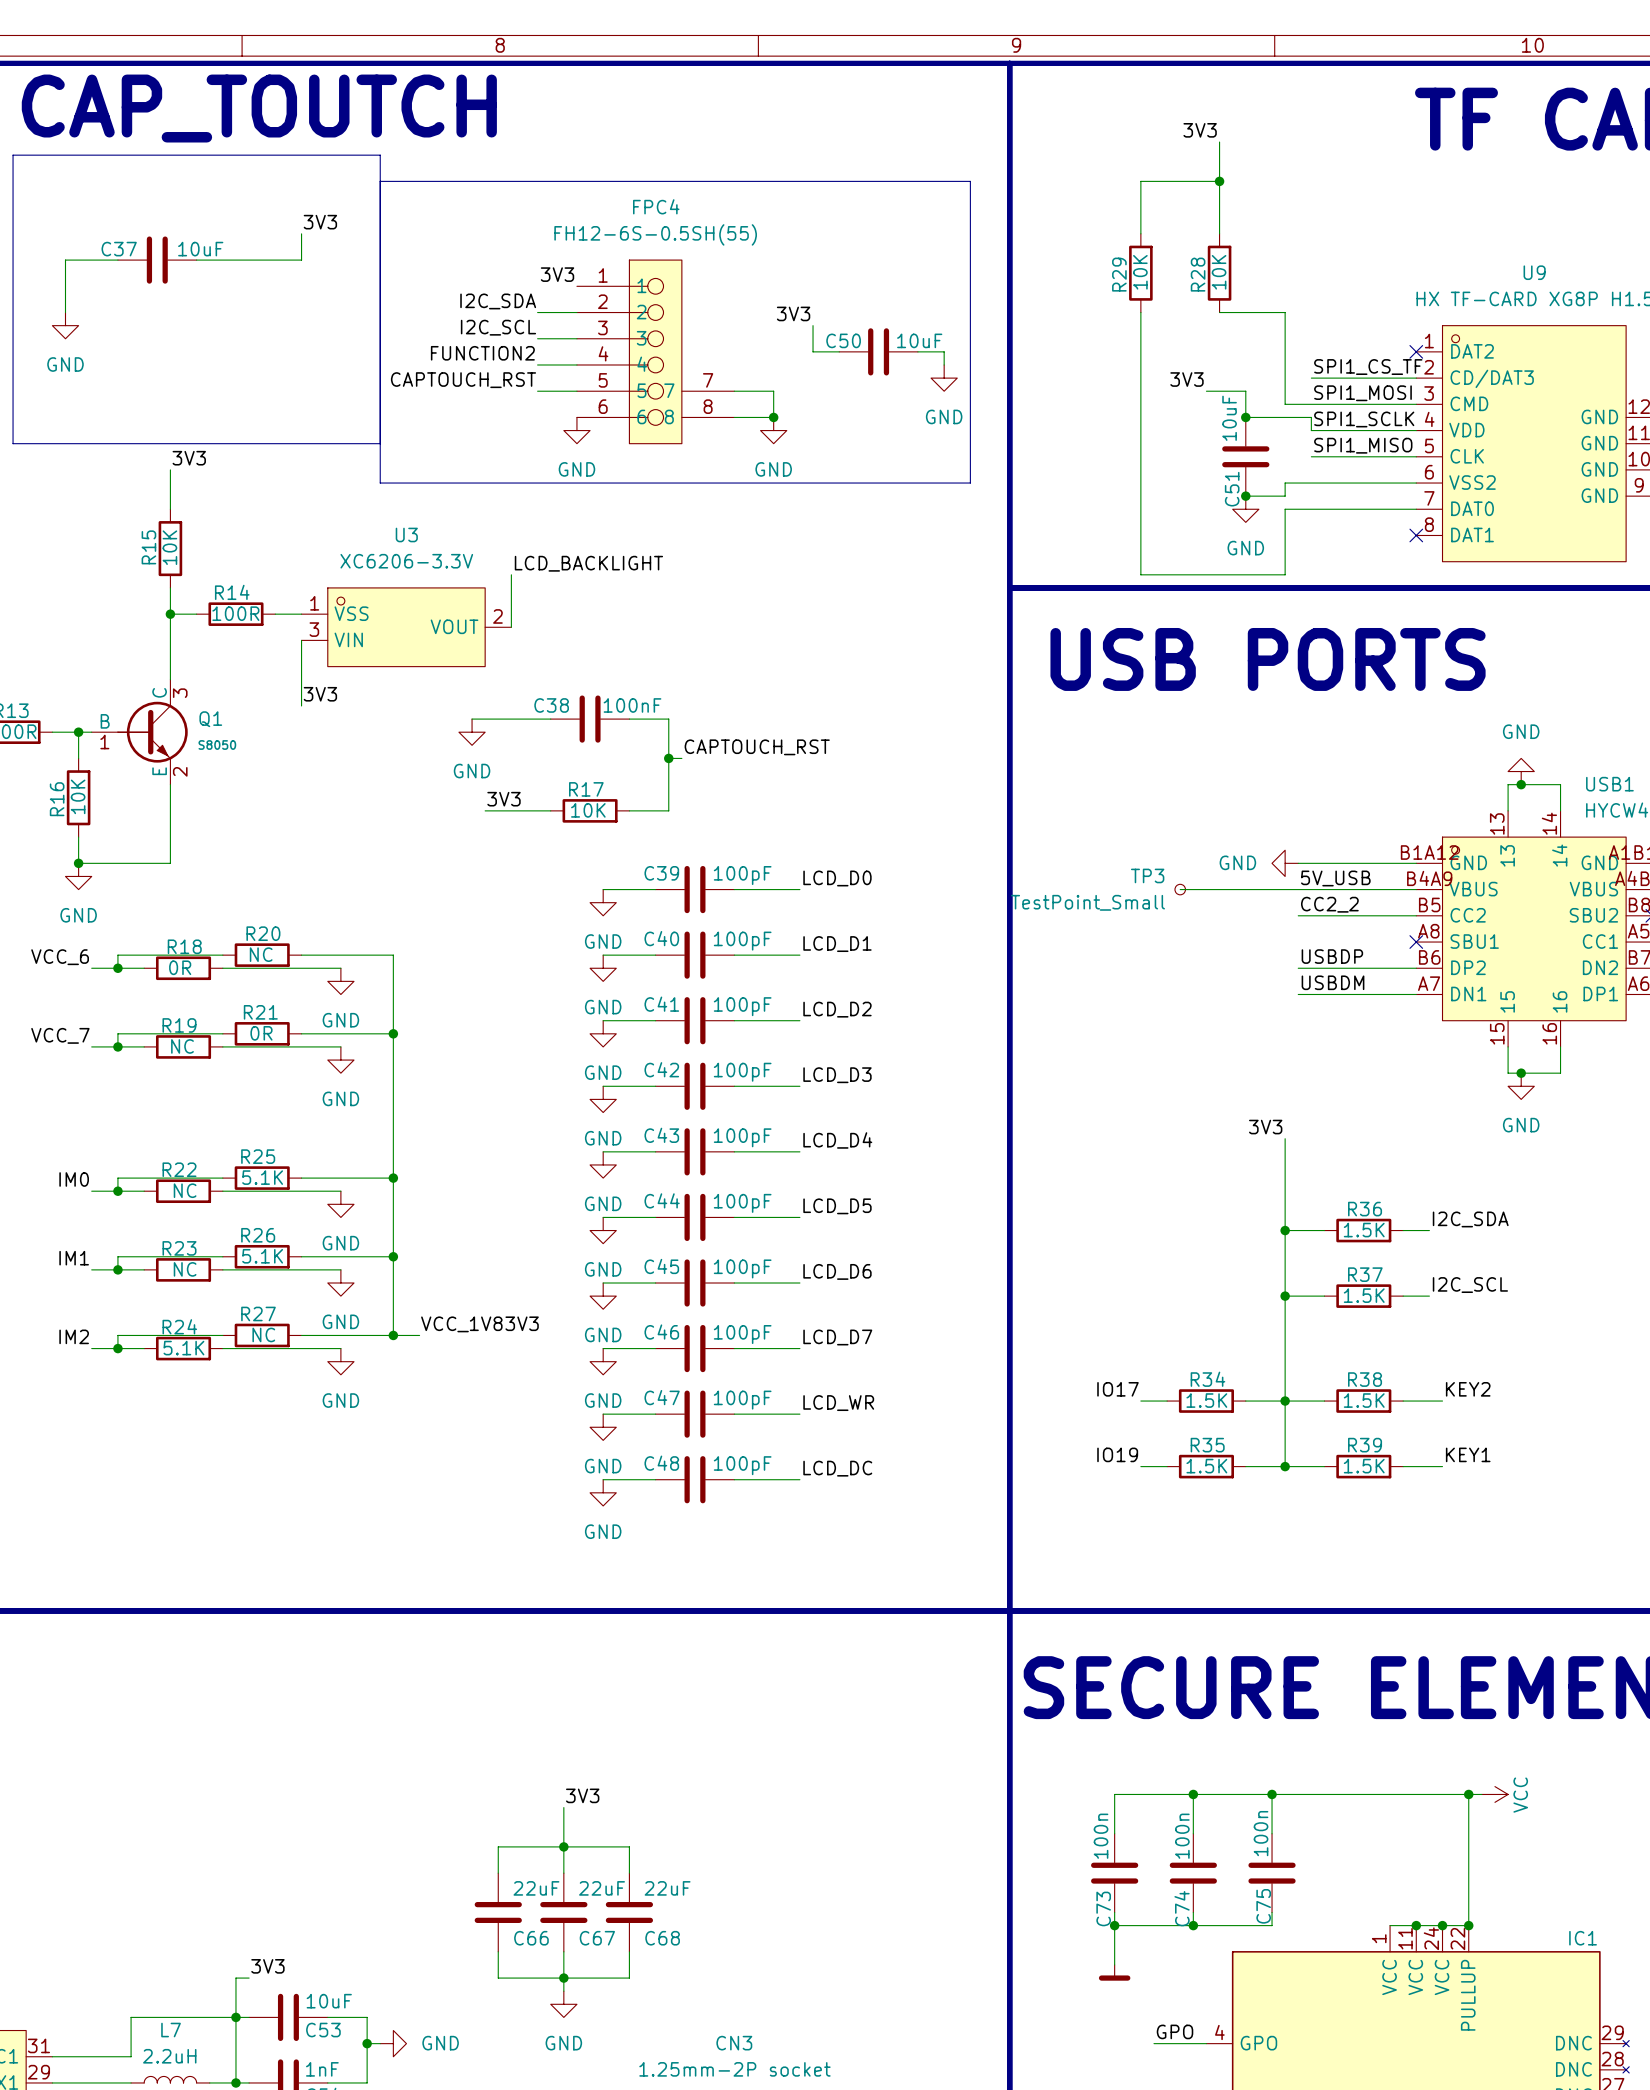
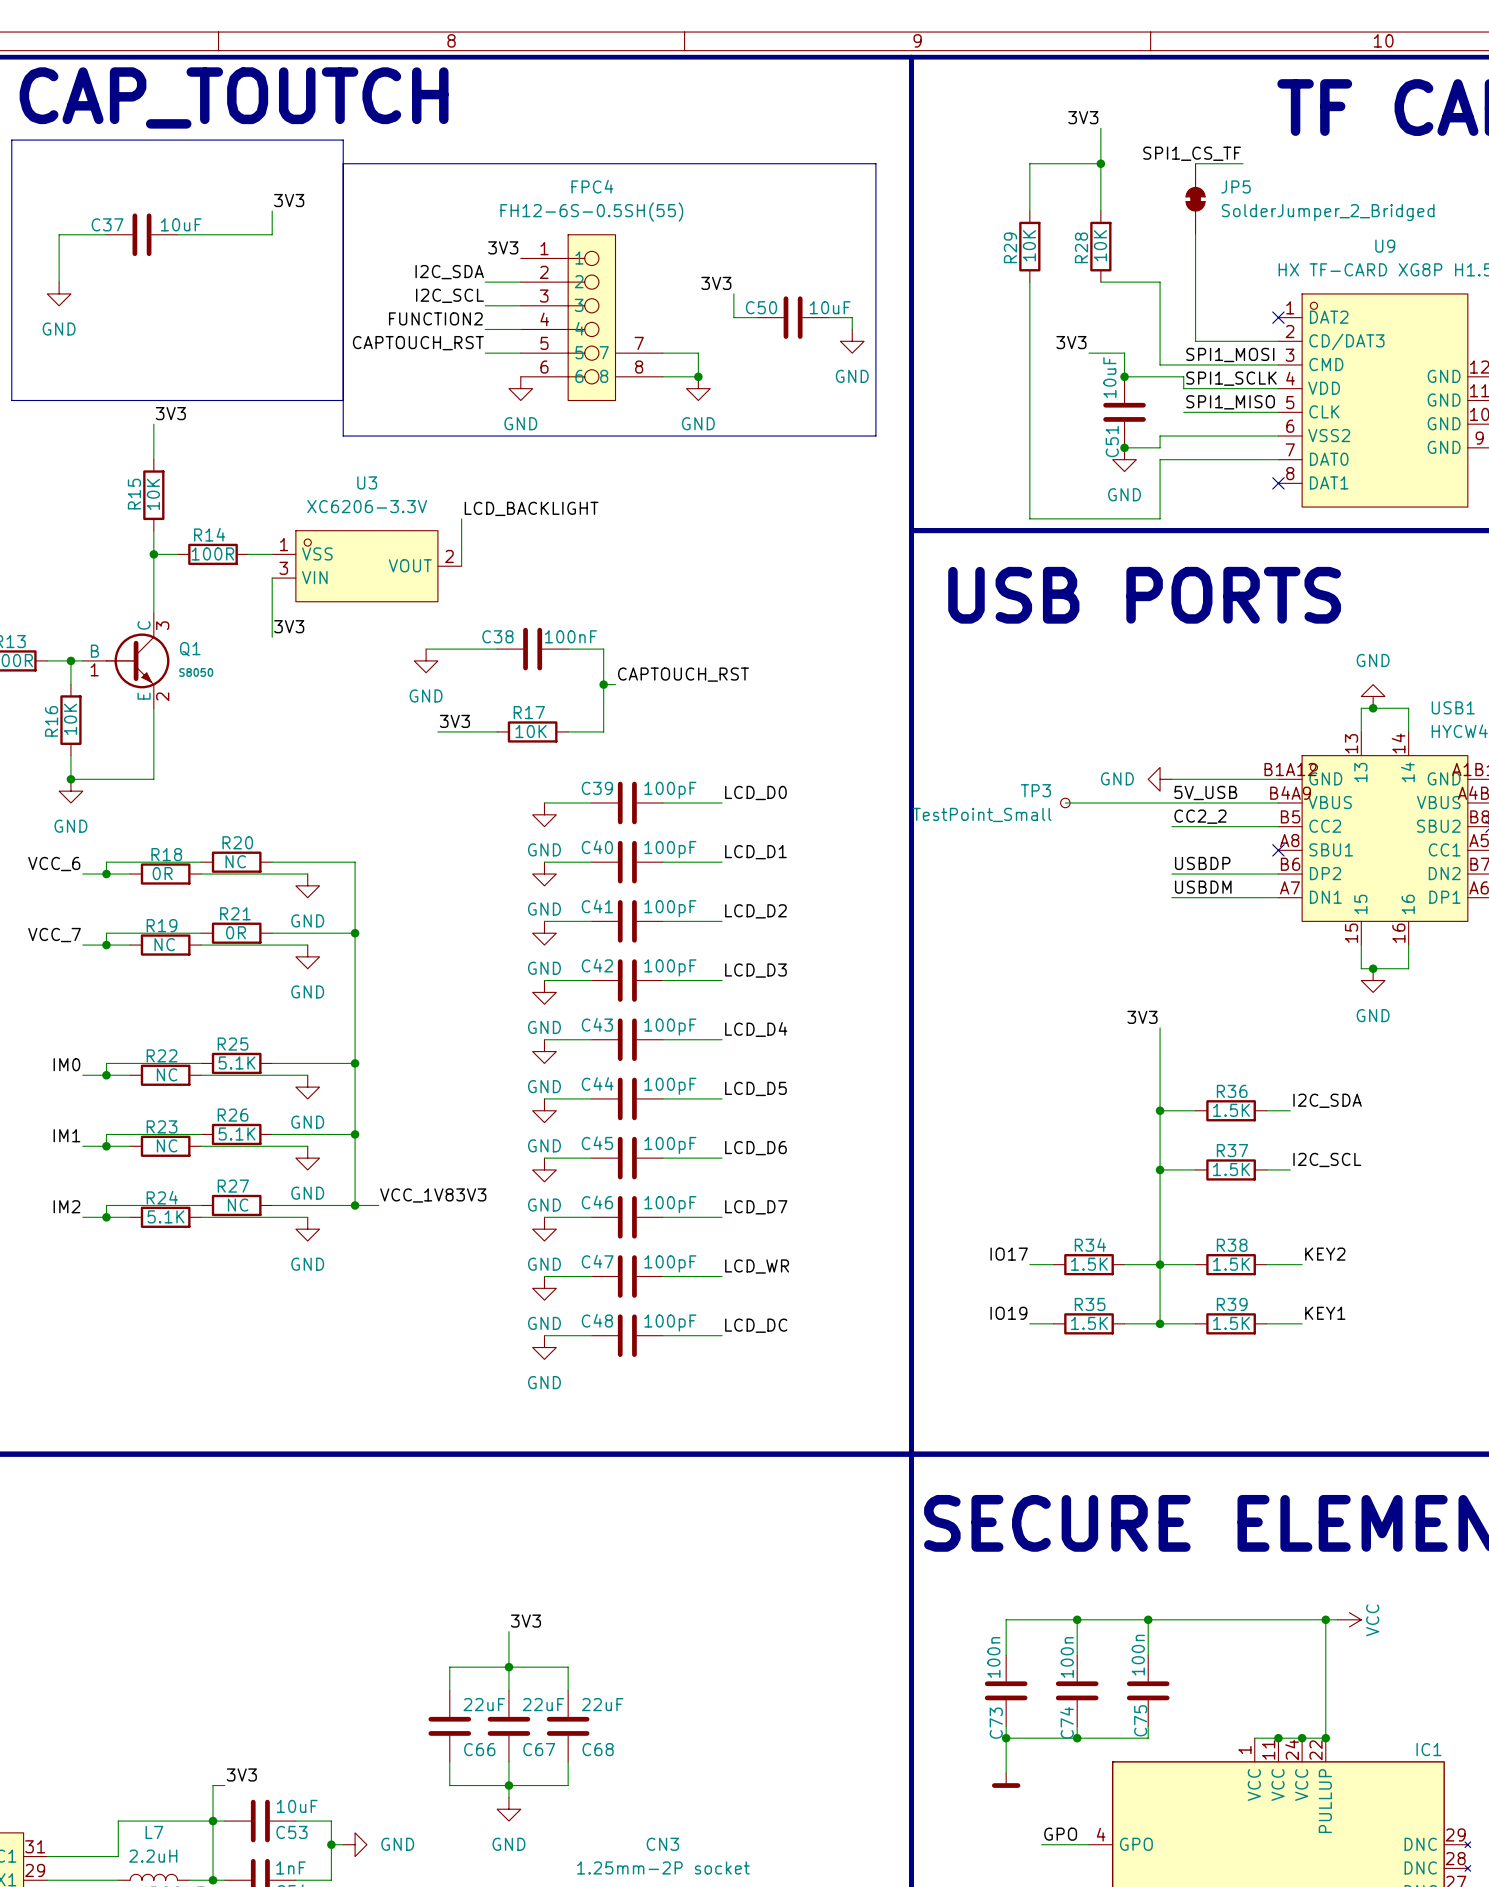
wire: none -> (1195, 163) (1242, 163)
JP5: none -> SolderJumper_2_Bridged (1195, 199)
label position: SPI1_CS_TF (1368, 367) -> SPI1_CS_TF (1192, 153)
wire: (1311, 378) (1324, 378) -> (1195, 234) (1195, 341)

